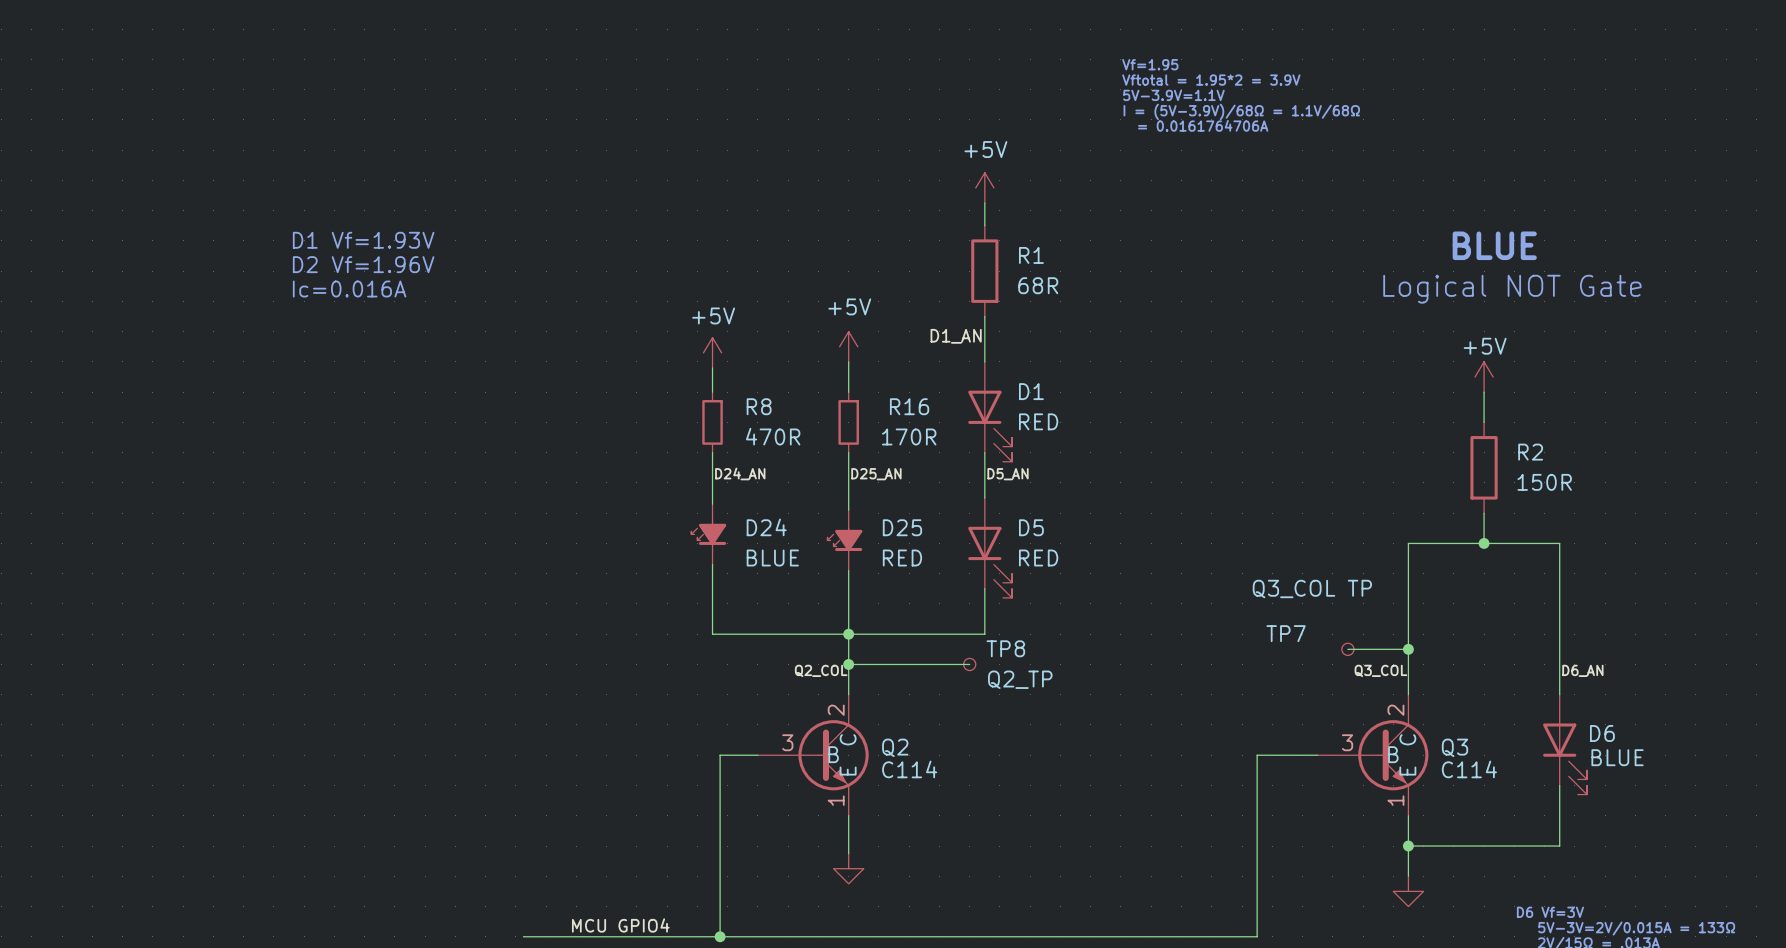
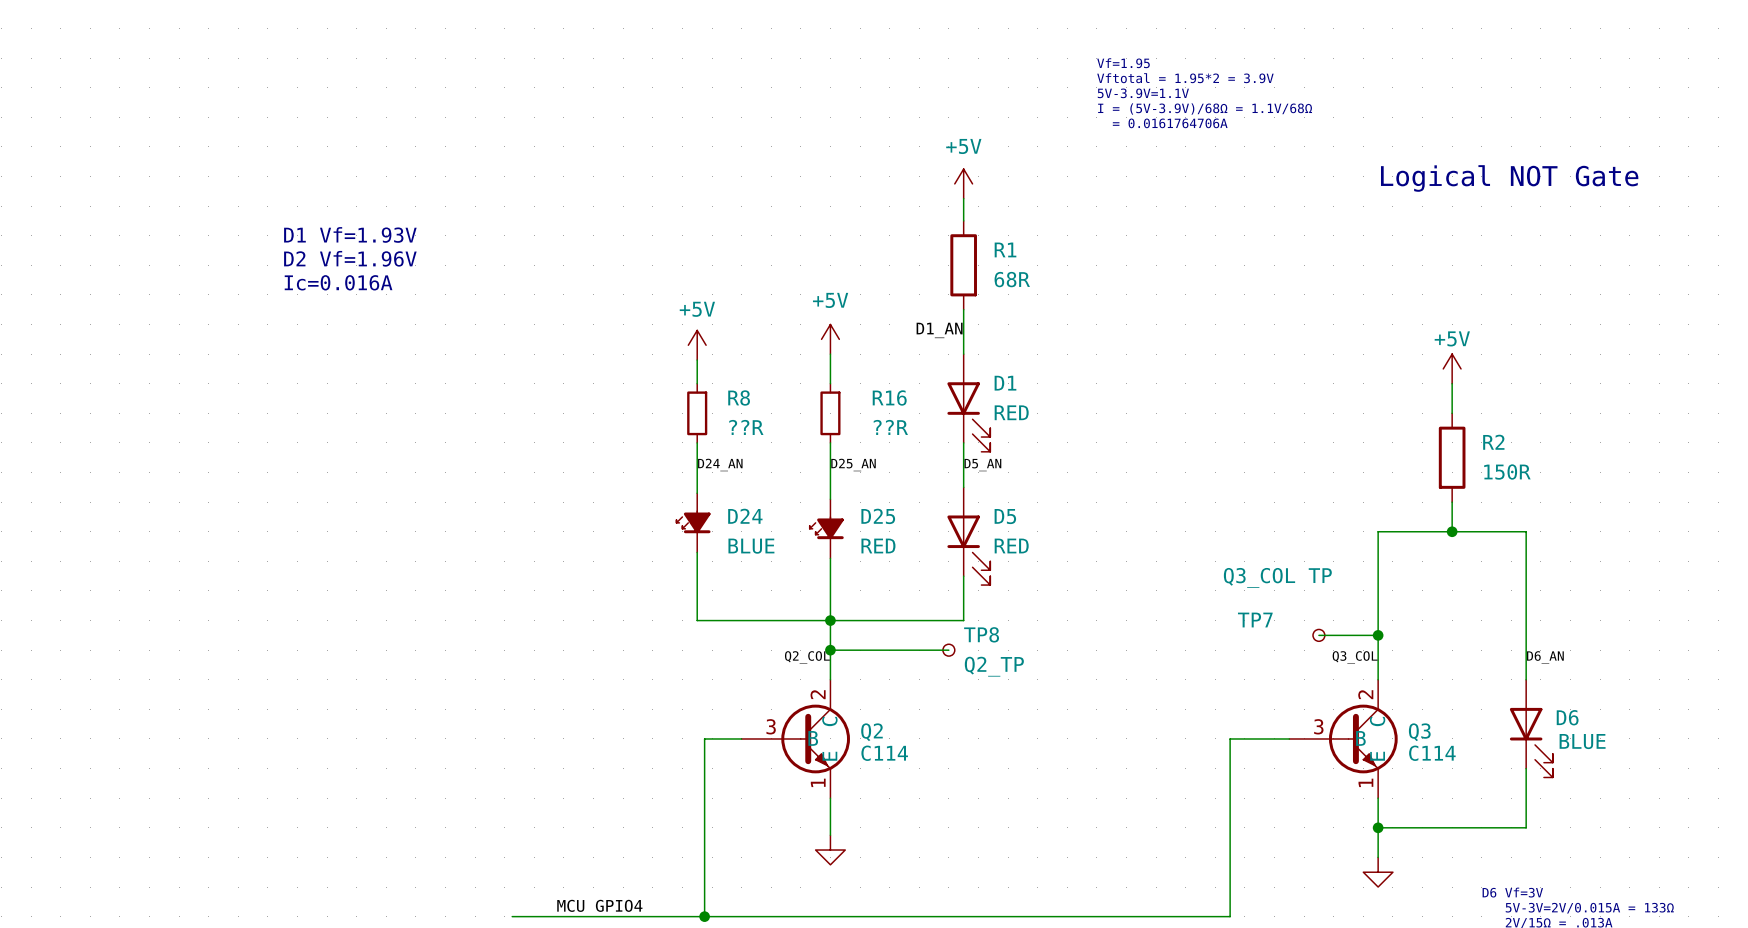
text: BLUE (1494, 245) -> none
text position: Logical NOT Gate (1512, 289) -> Logical NOT Gate (1509, 178)
R8 value: 470R (773, 436) -> ??R (746, 427)
R16 value: 170R (909, 436) -> ??R (890, 427)

